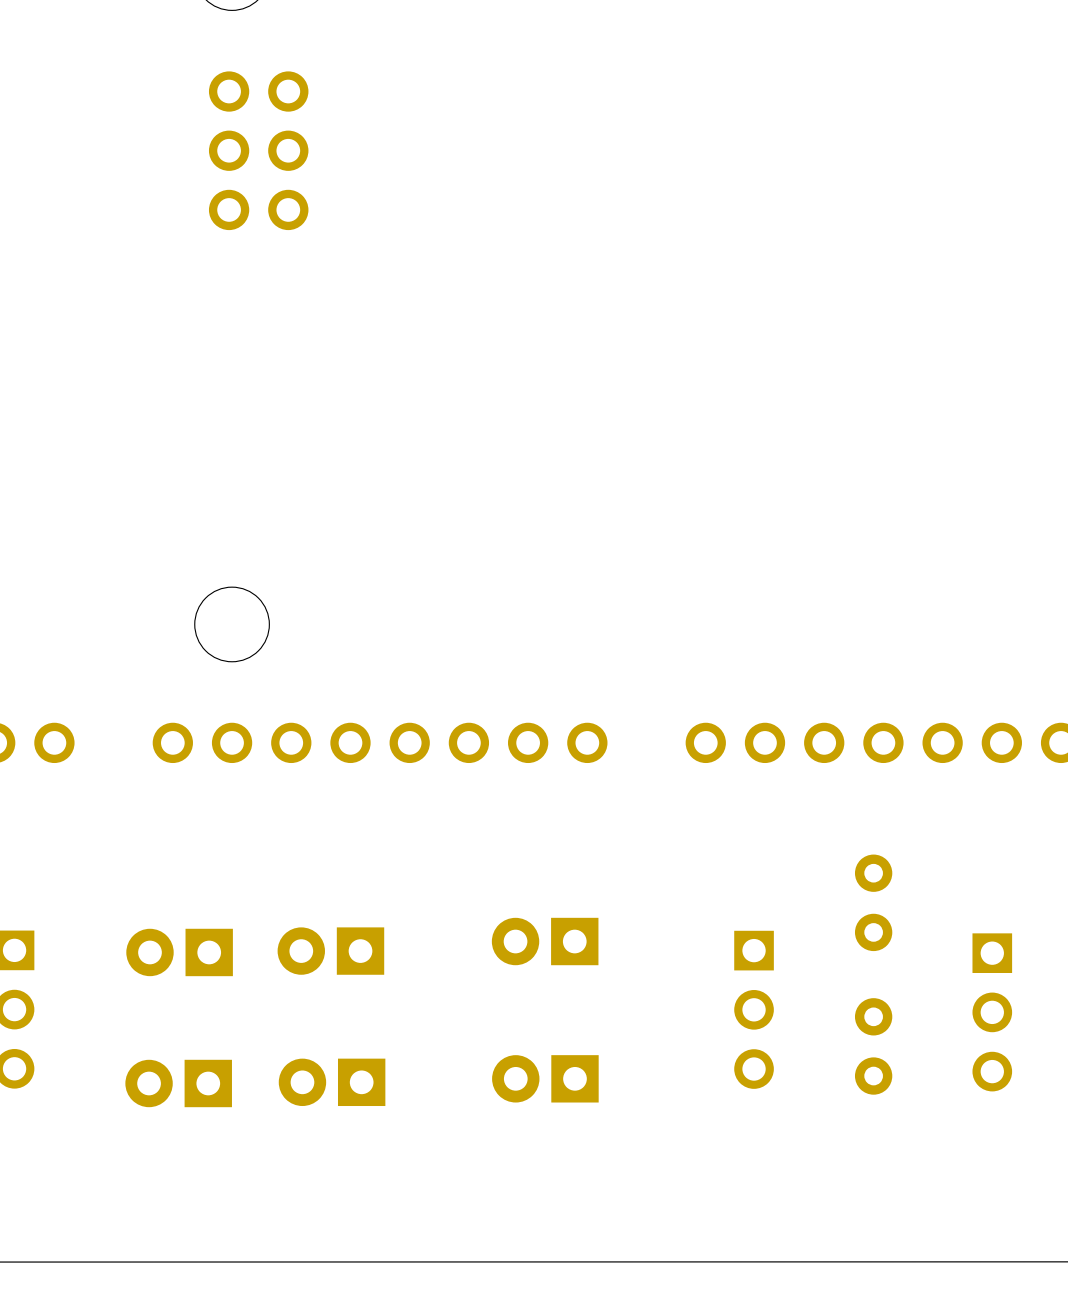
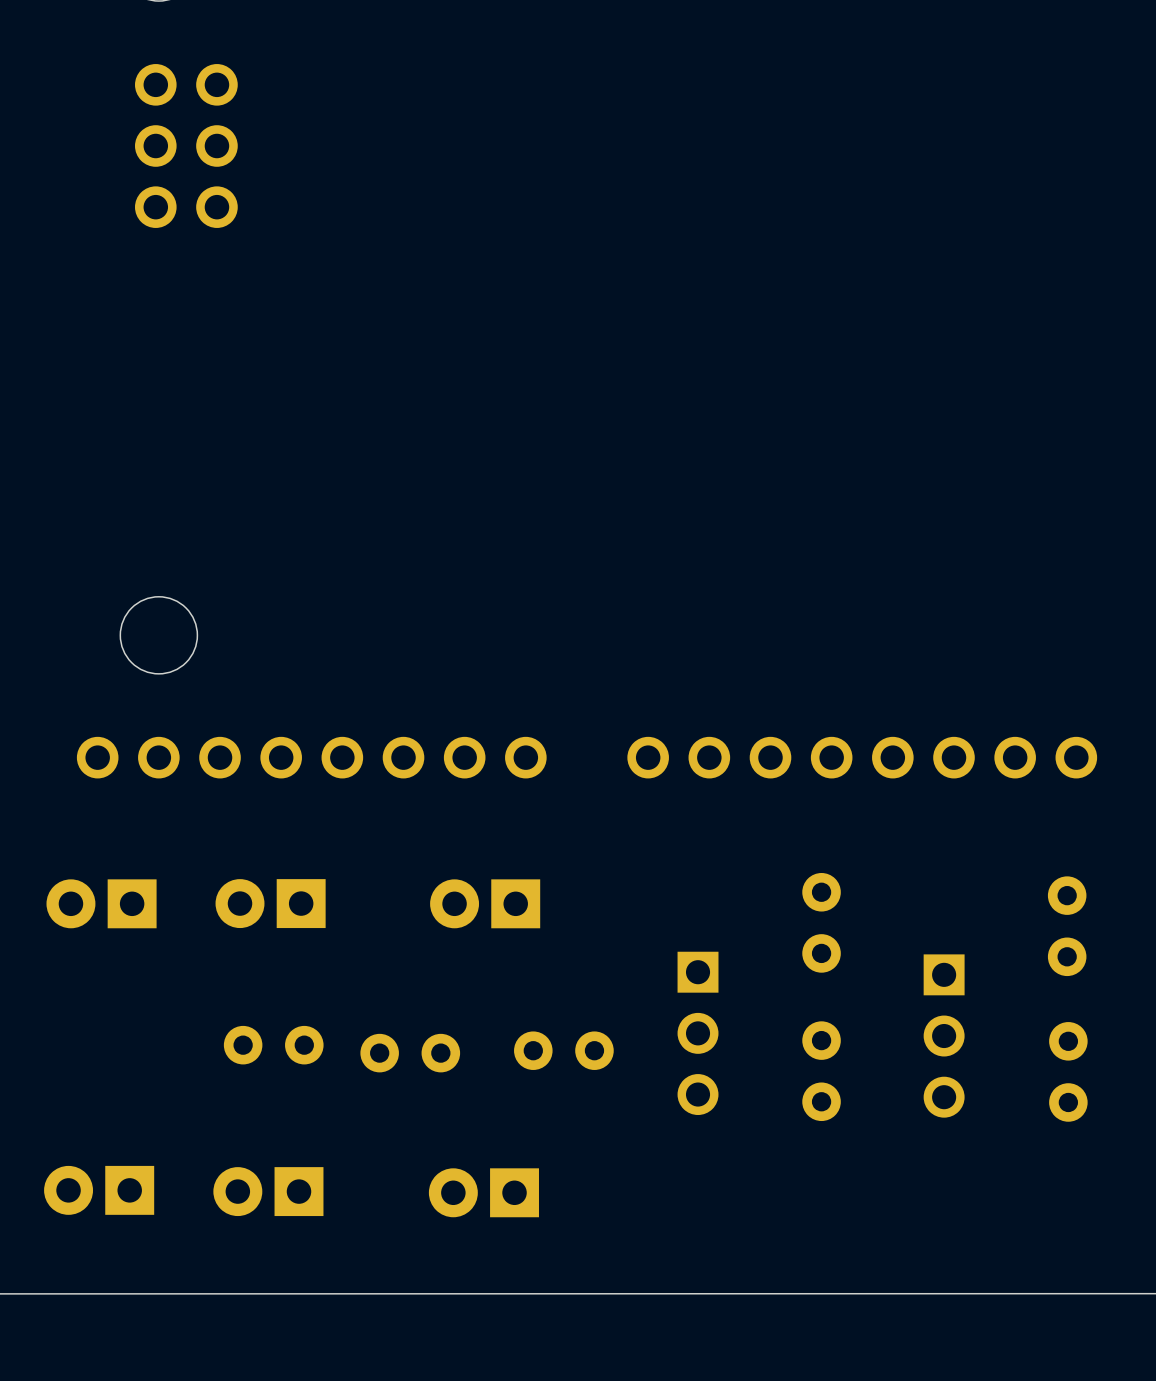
part position: (545, 941) -> (485, 903)
part position: (330, 951) -> (270, 903)
part position: (179, 952) -> (101, 903)
part: none -> (273, 1045)
part: none -> (563, 1050)
part: none -> (410, 1053)
part position: (545, 1078) -> (483, 1192)
part position: (332, 1082) -> (268, 1191)
part position: (178, 1083) -> (99, 1190)

